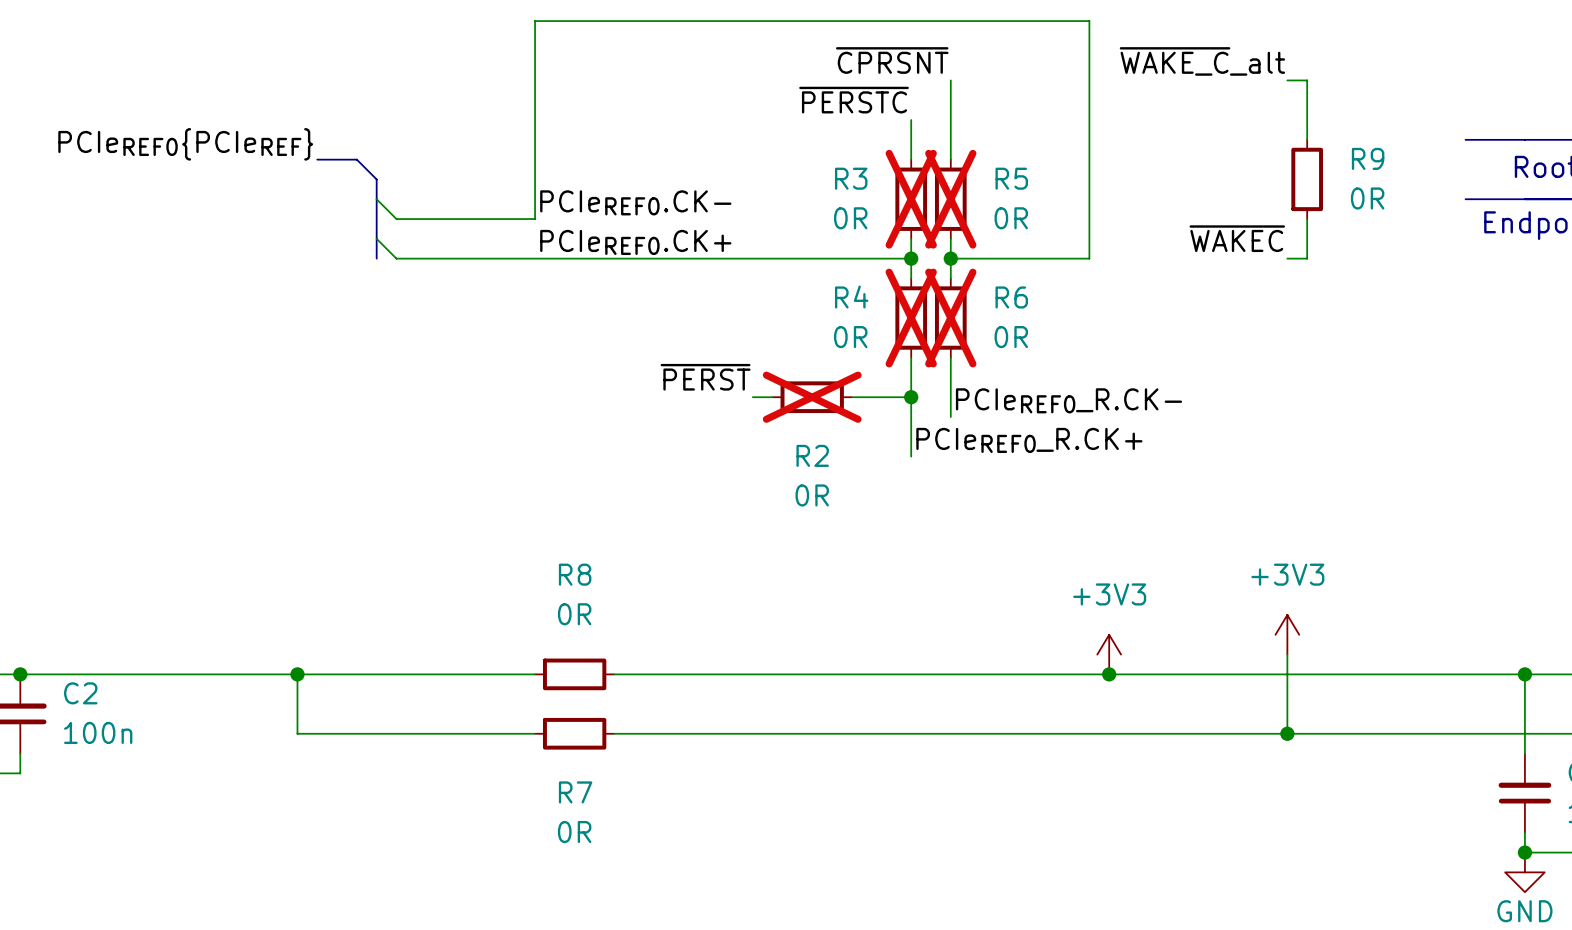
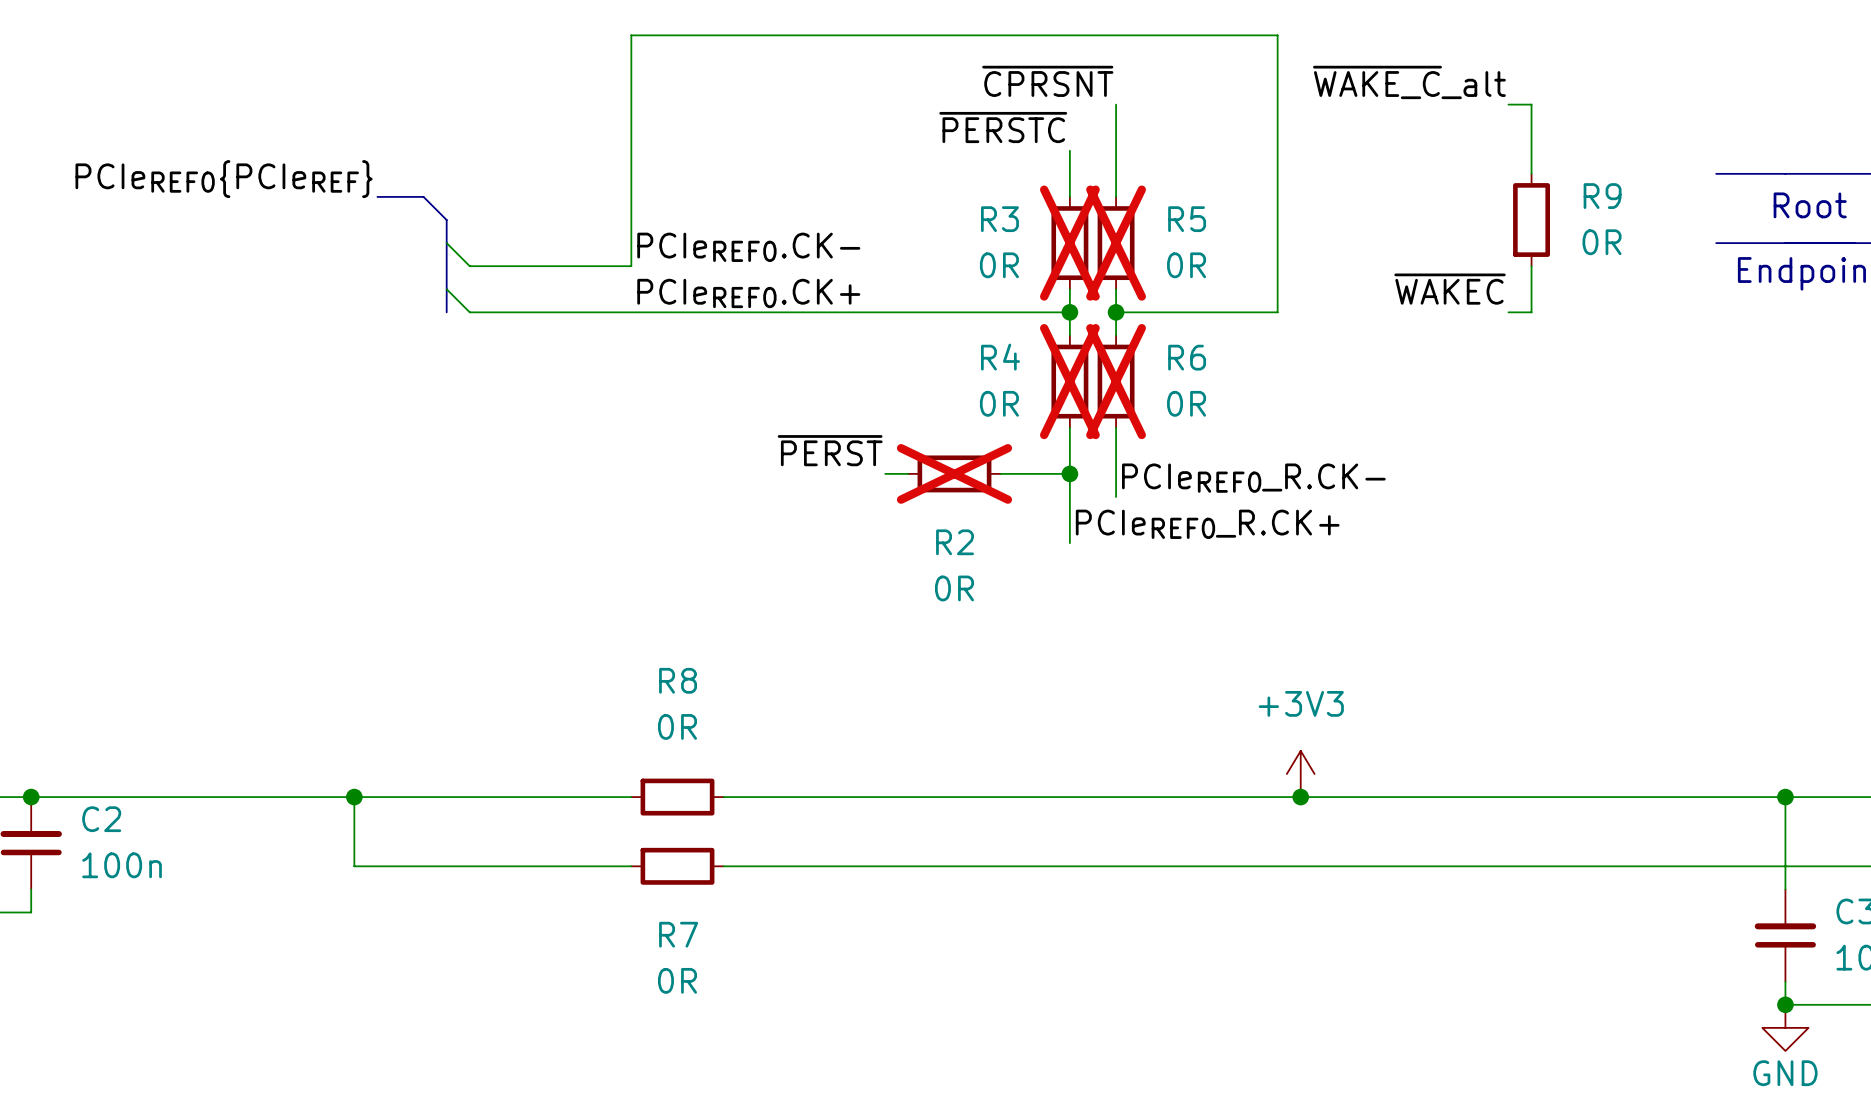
power symbol: +3V3 (1287, 634) -> none
wire: (1287, 654) (1287, 733) -> none
junction: (1287, 733) -> none

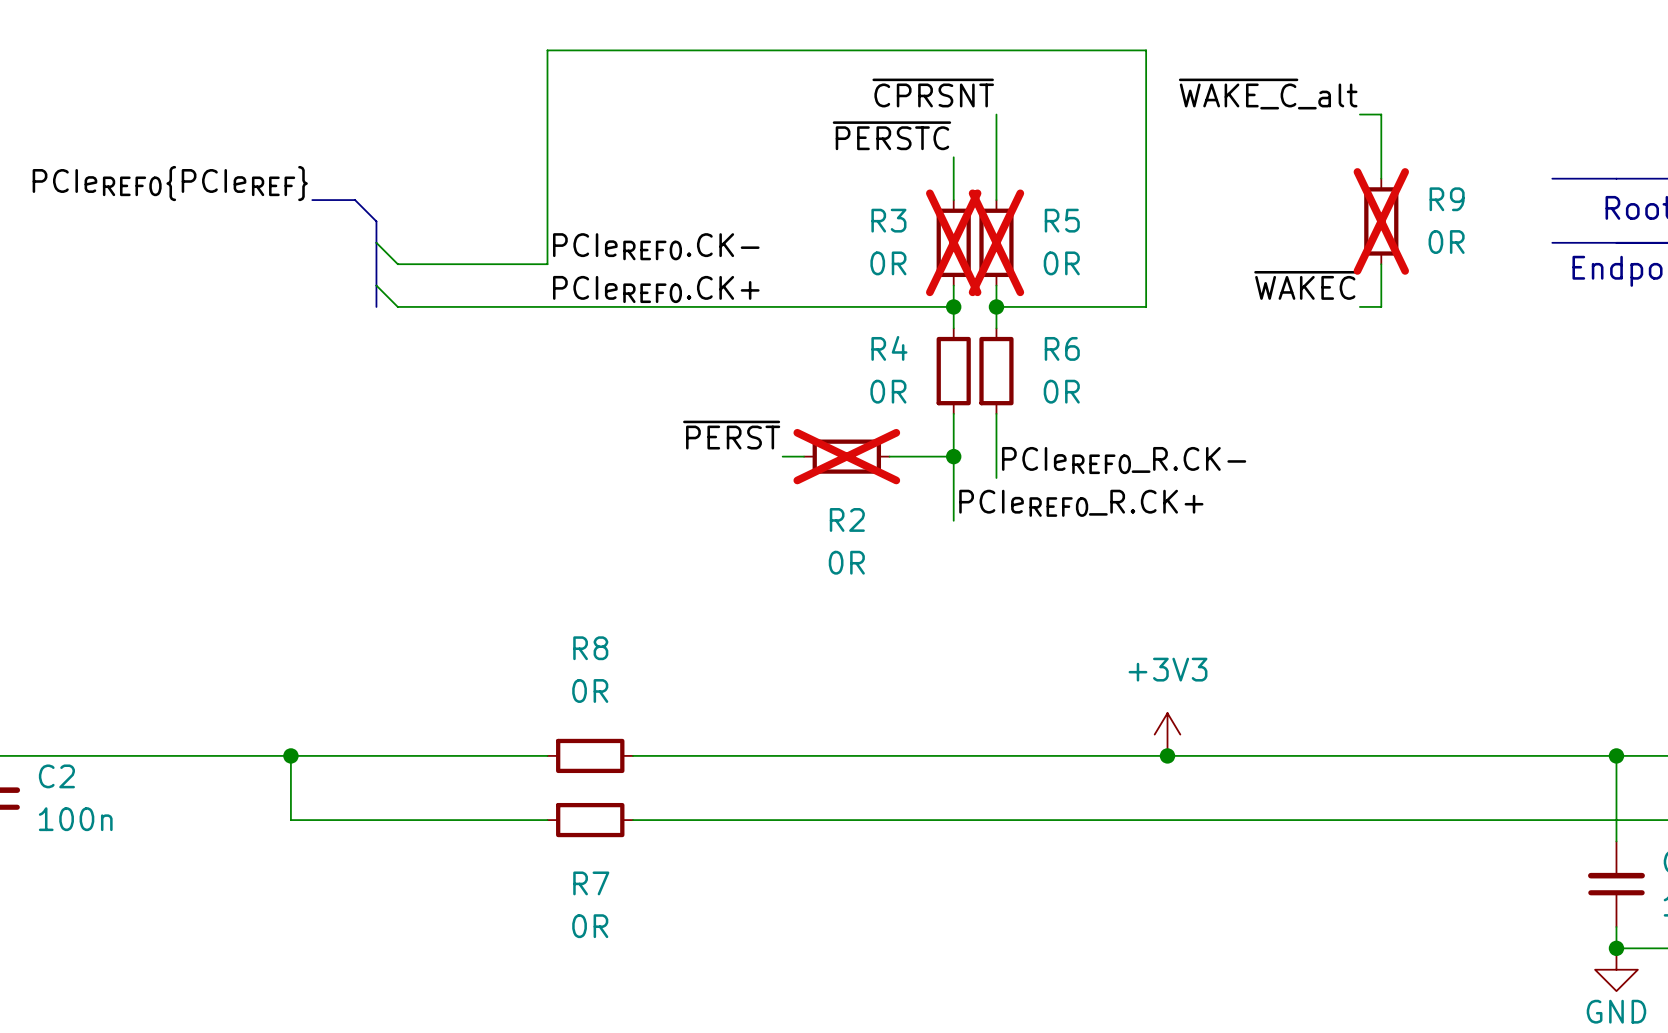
R9 do-not-place cross: none -> (1381, 221)
R4 do-not-place cross: (1069, 381) -> none
R6 do-not-place cross: (1116, 381) -> none

